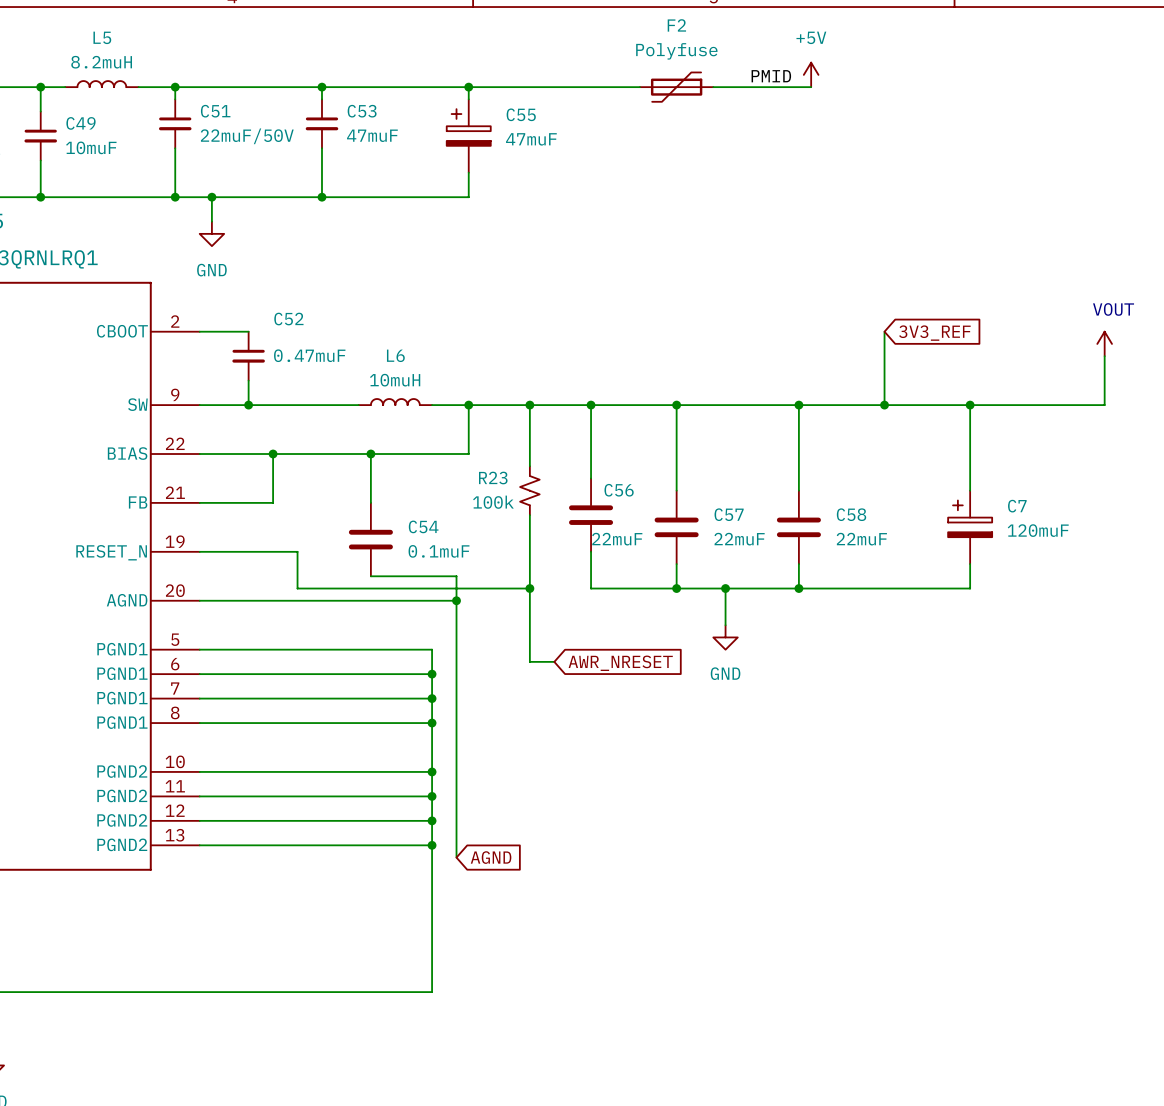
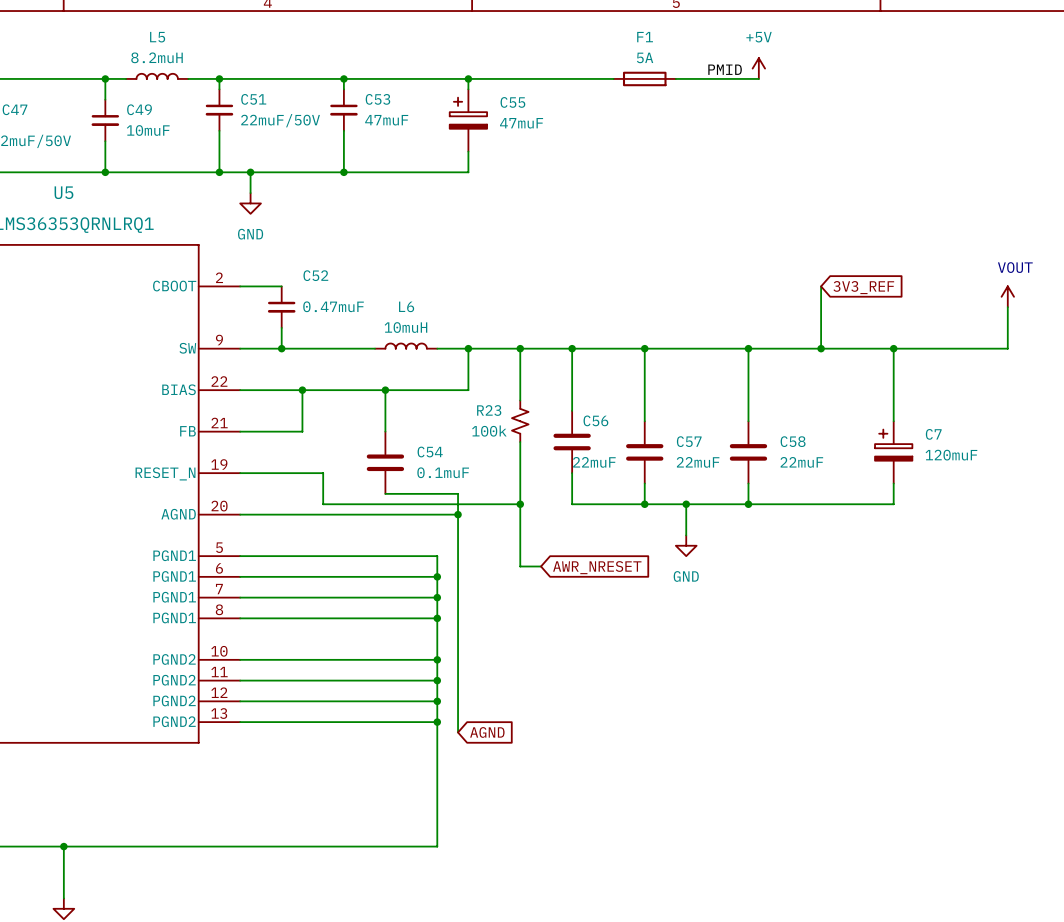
F2: Polyfuse (676, 87) -> none
F1: none -> 5A (644, 78)

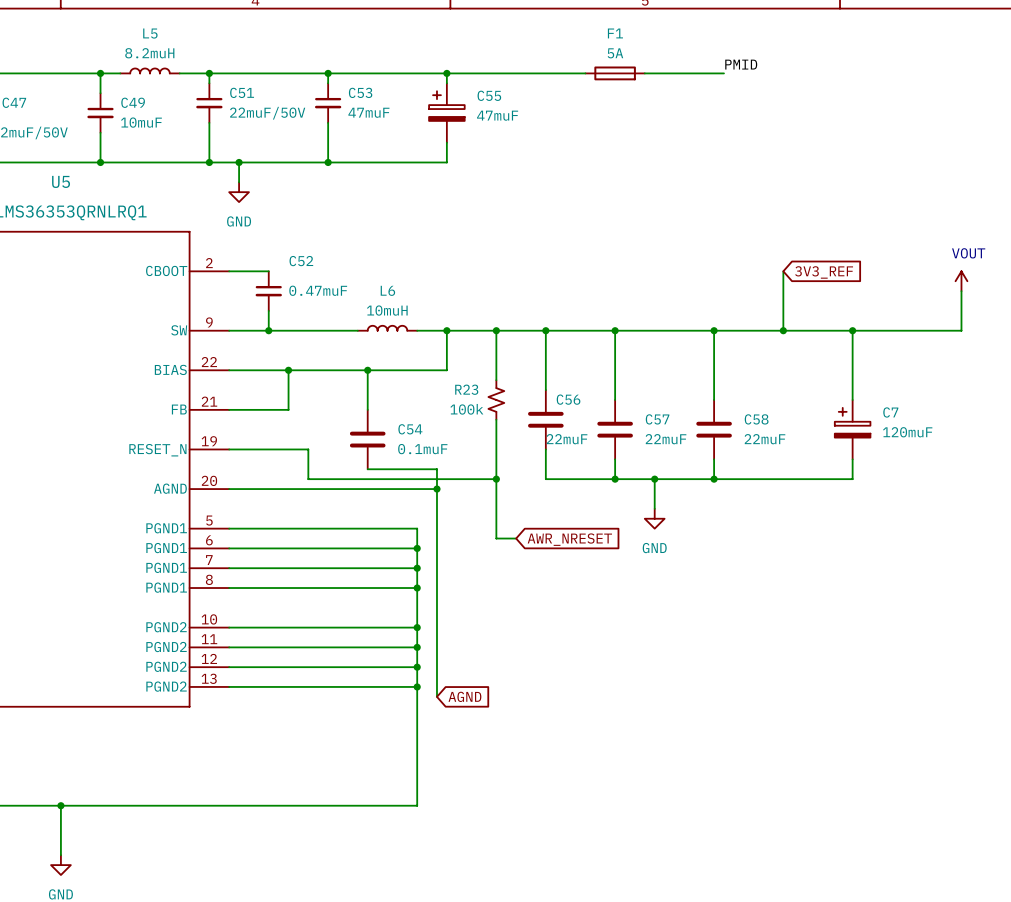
power symbol: +5V (758, 68) -> none
label position: PMID (725, 69) -> PMID (741, 64)

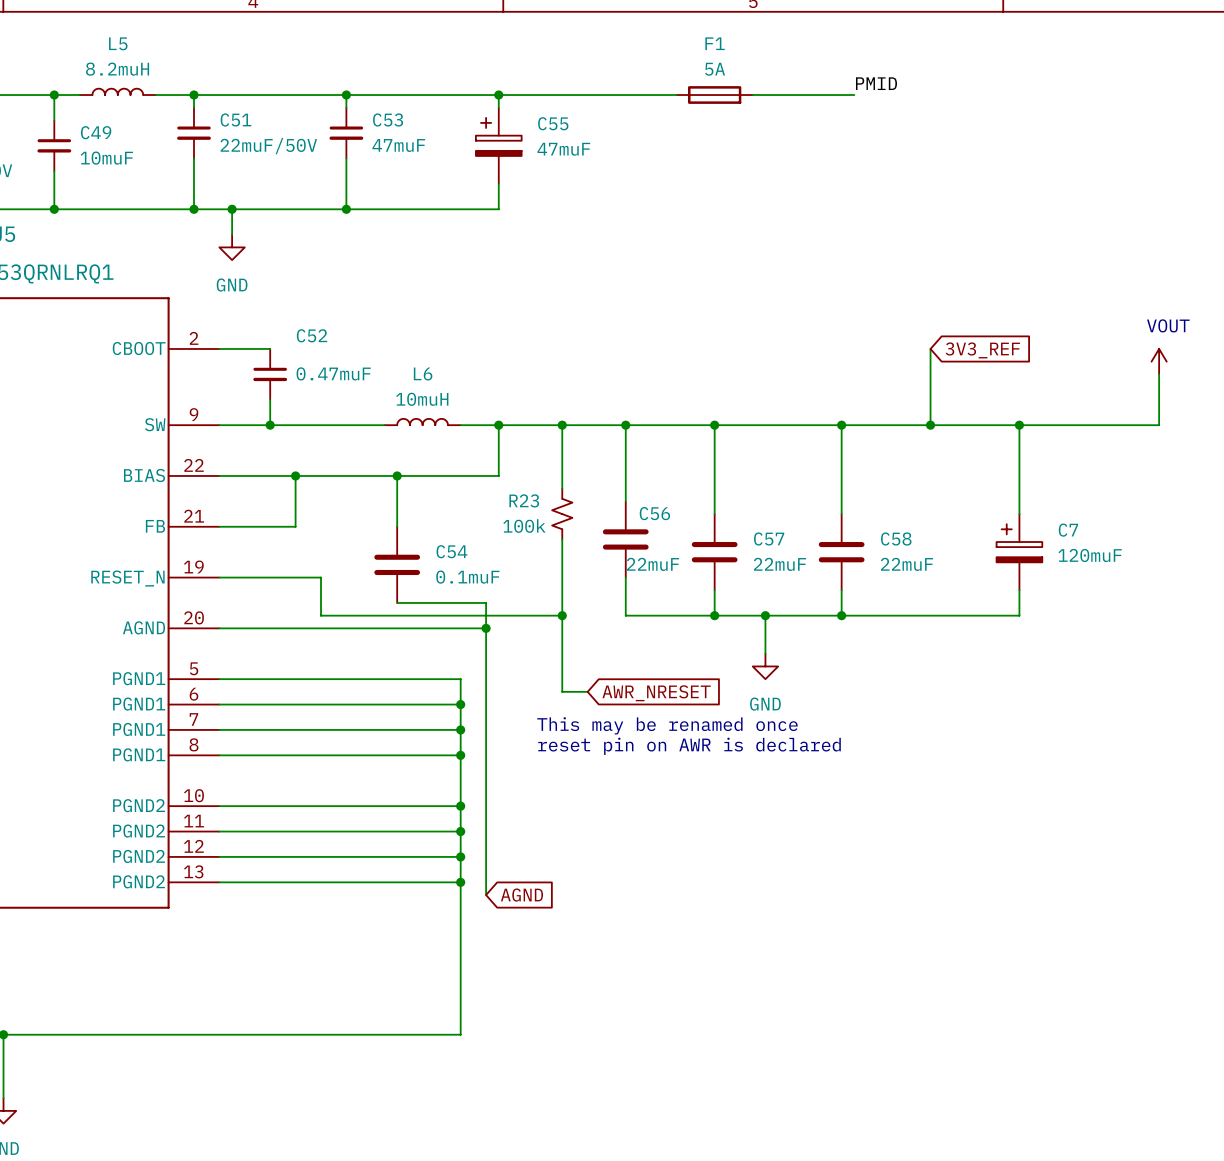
text: none -> This may be renamed once (667, 725)
text: none -> reset pin on AWR is declared (689, 746)

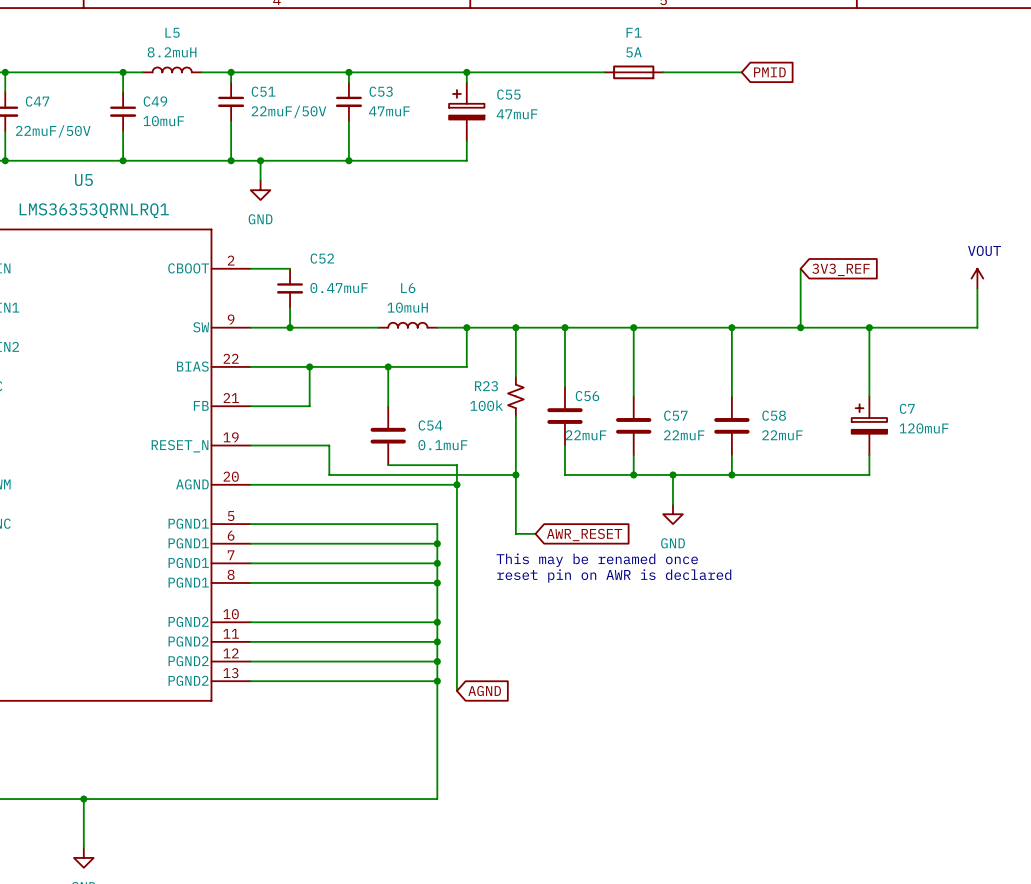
label: PMID (876, 83) -> none
global label: none -> PMID (769, 72)
global label: AWR_NRESET (656, 693) -> AWR_RESET (584, 535)

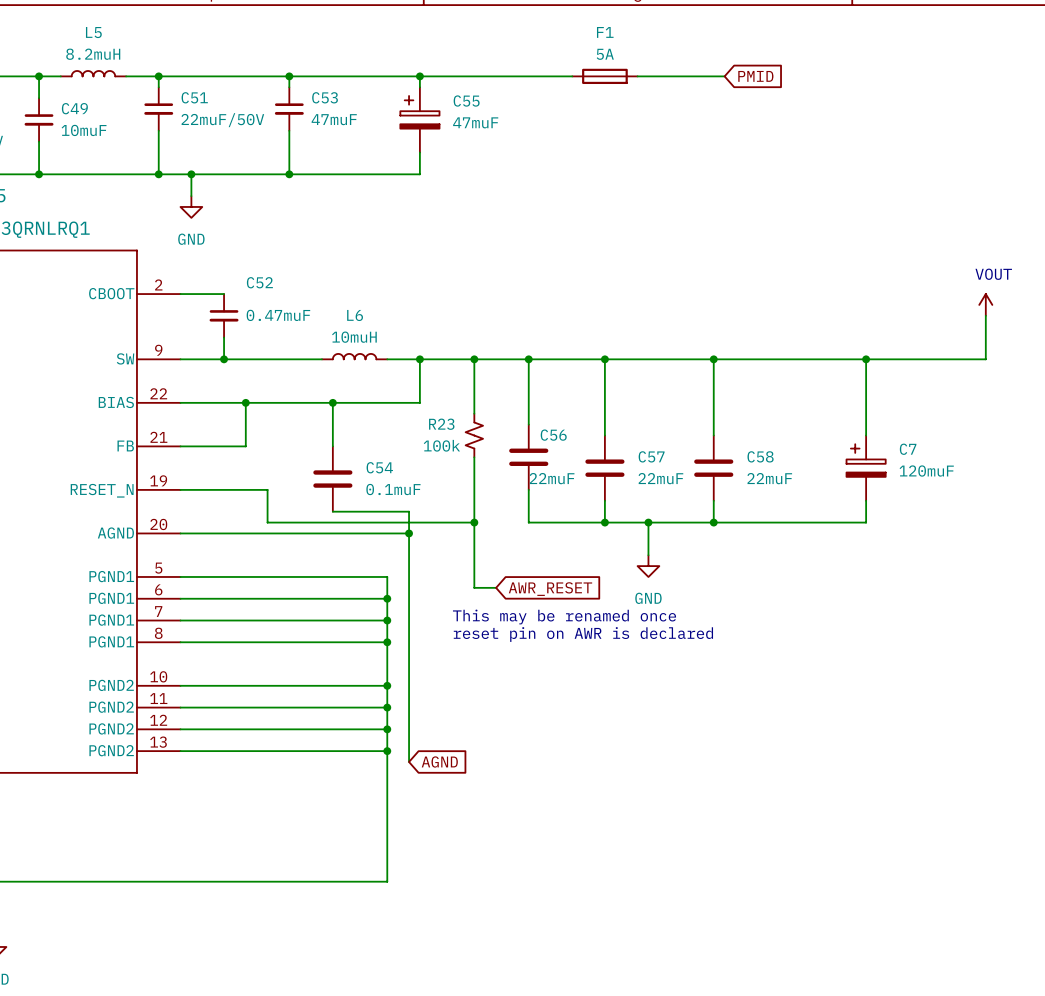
wire: (800, 268) (800, 327) -> none
global label: 3V3_REF (841, 269) -> none
junction: (800, 327) -> none

